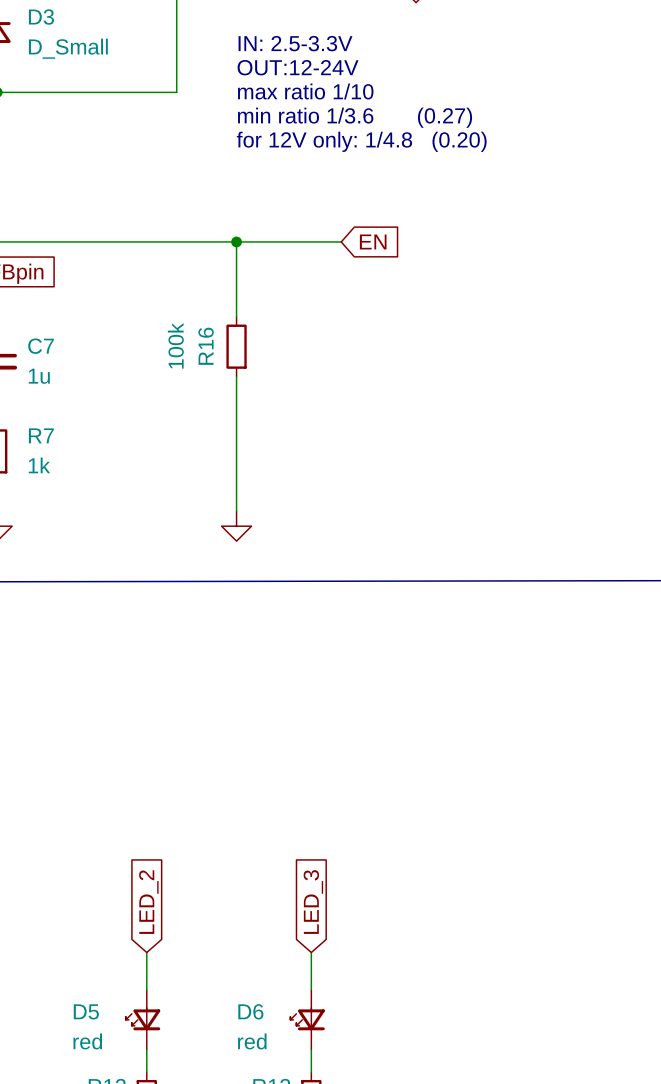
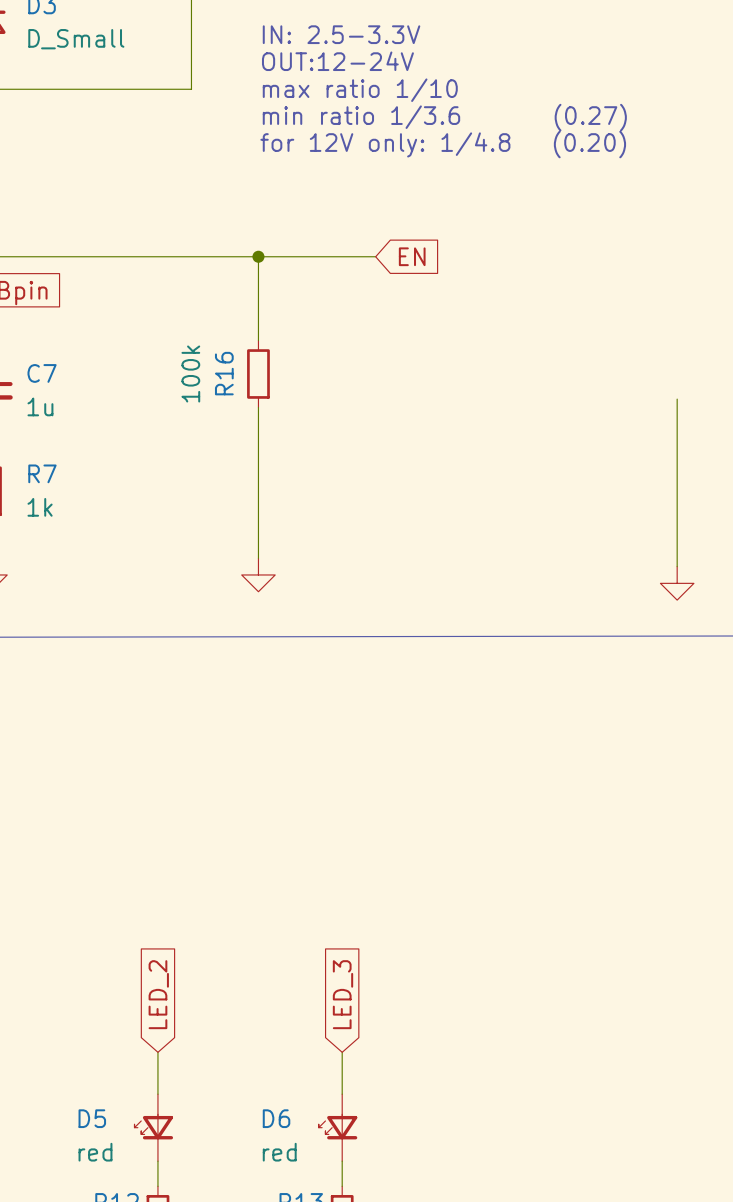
wire: none -> (677, 399) (677, 566)
power symbol: none -> (677, 583)

